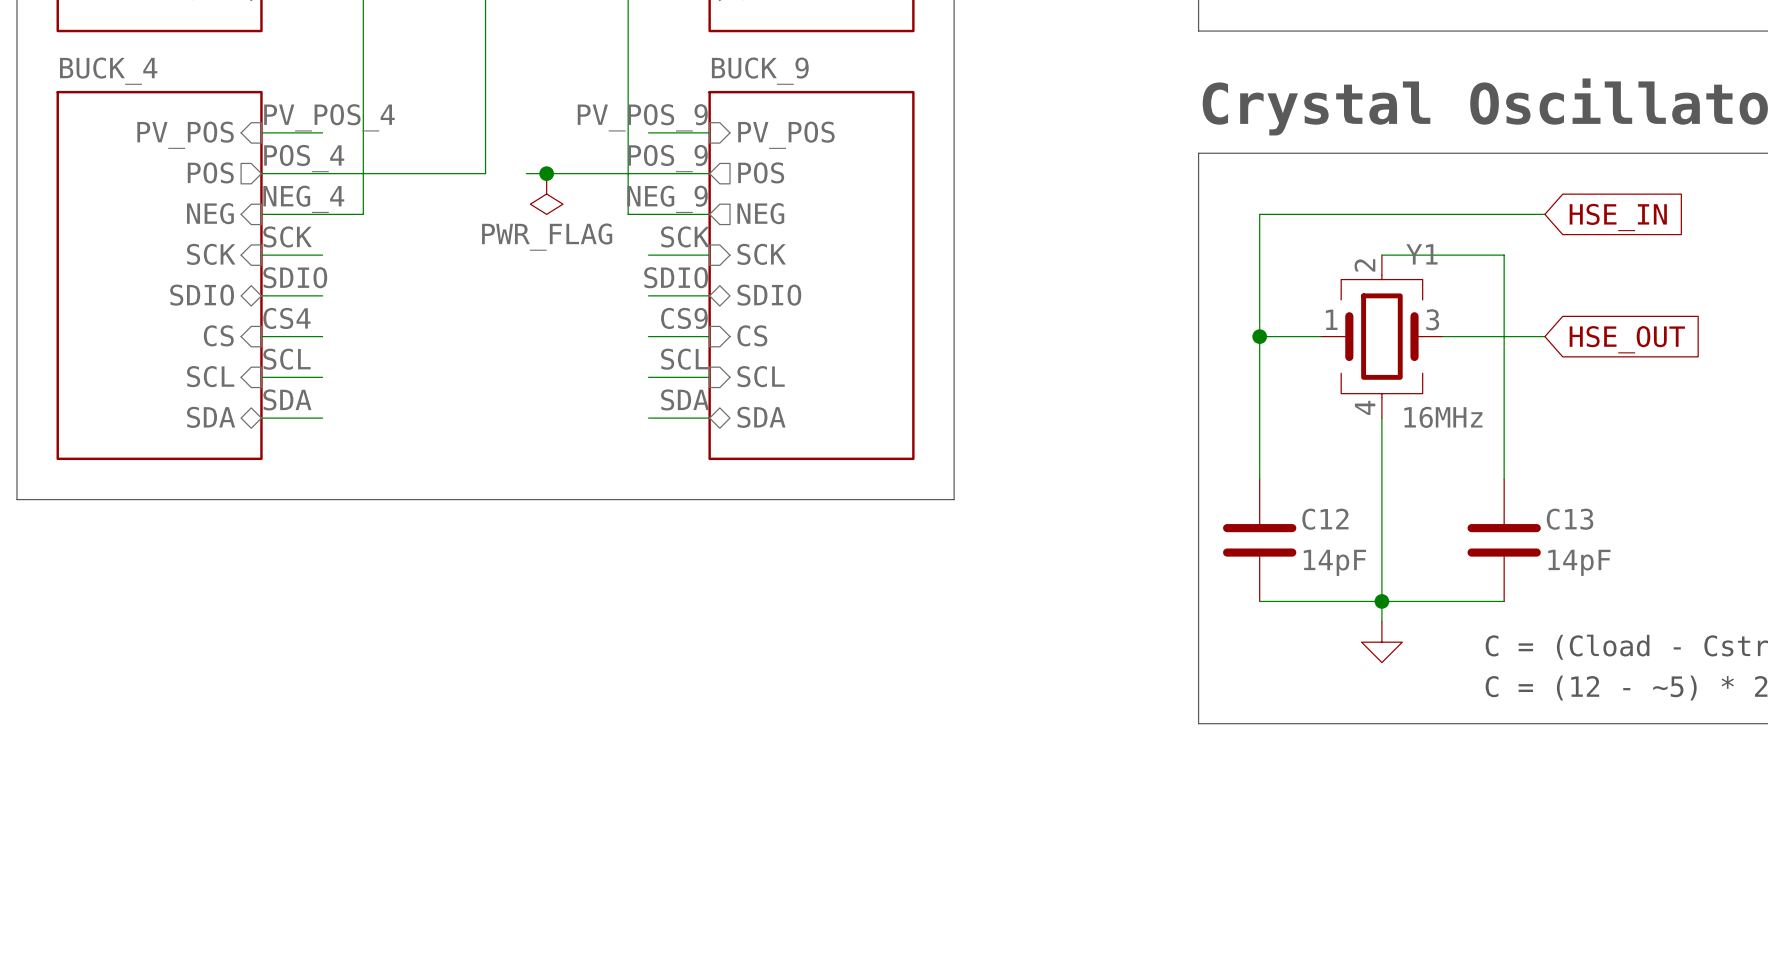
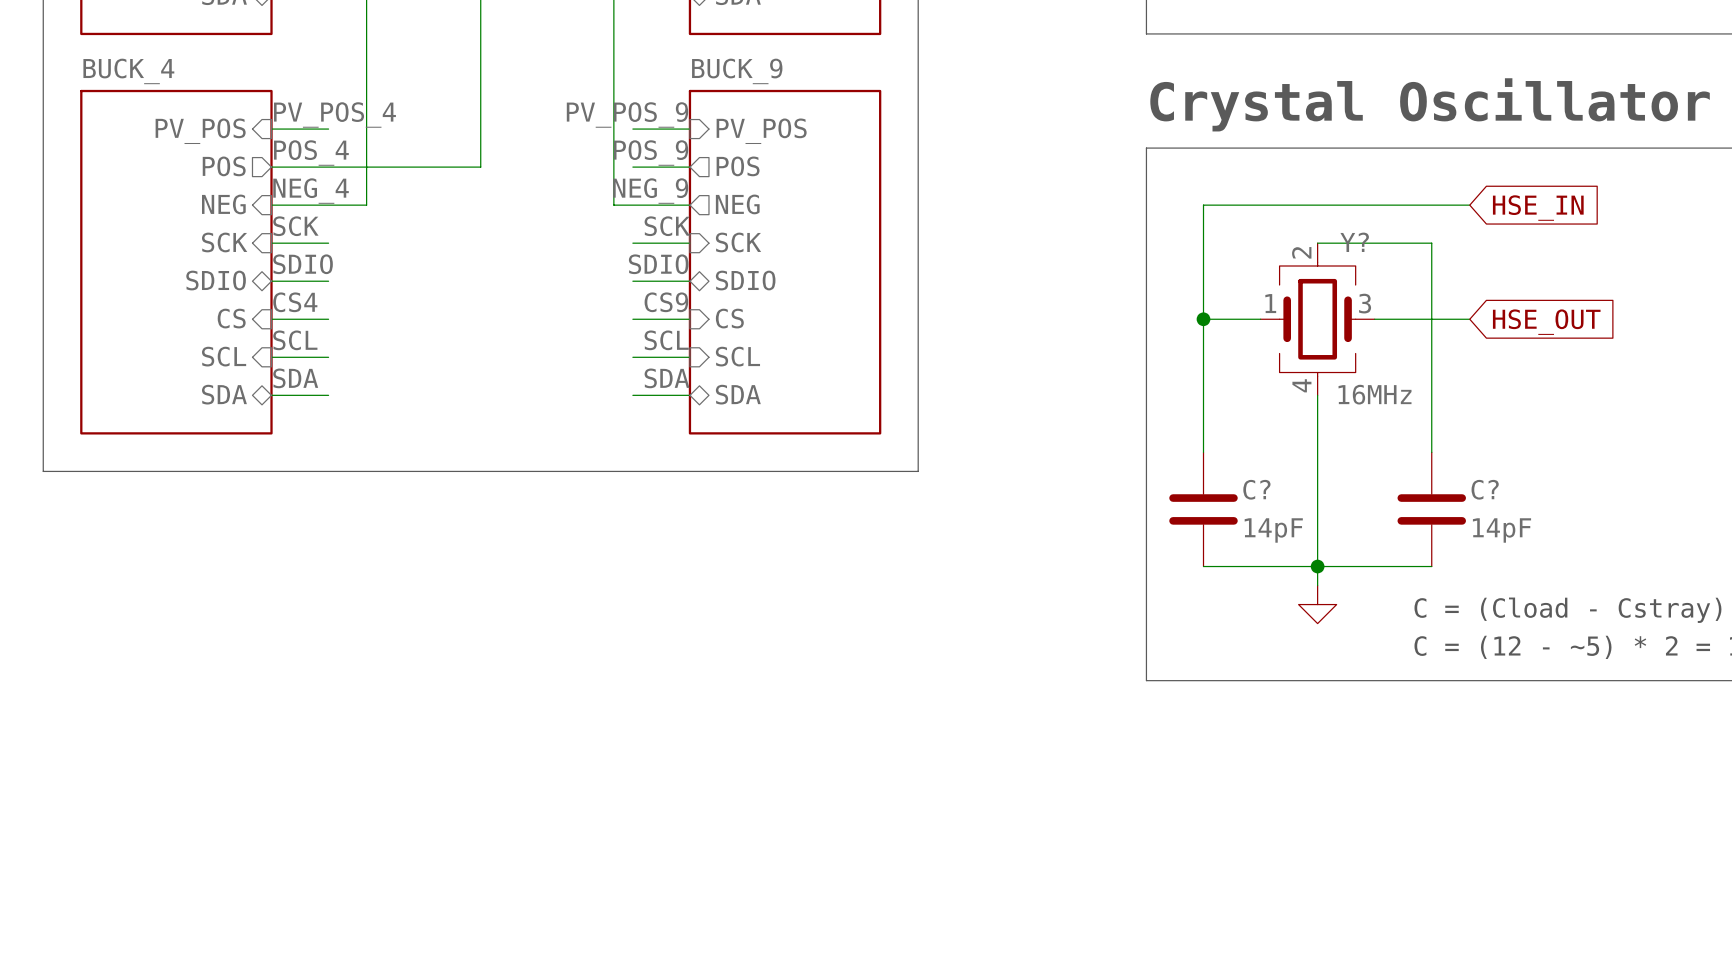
wire: (526, 173) (648, 173) -> none
junction: (546, 173) -> none
power symbol: PWR_FLAG (546, 194) -> none
Y1 name: Y1 (1421, 254) -> Y? (1354, 242)
C12 name: C12 (1325, 519) -> C? (1256, 489)
C13 name: C13 (1570, 519) -> C? (1485, 489)

